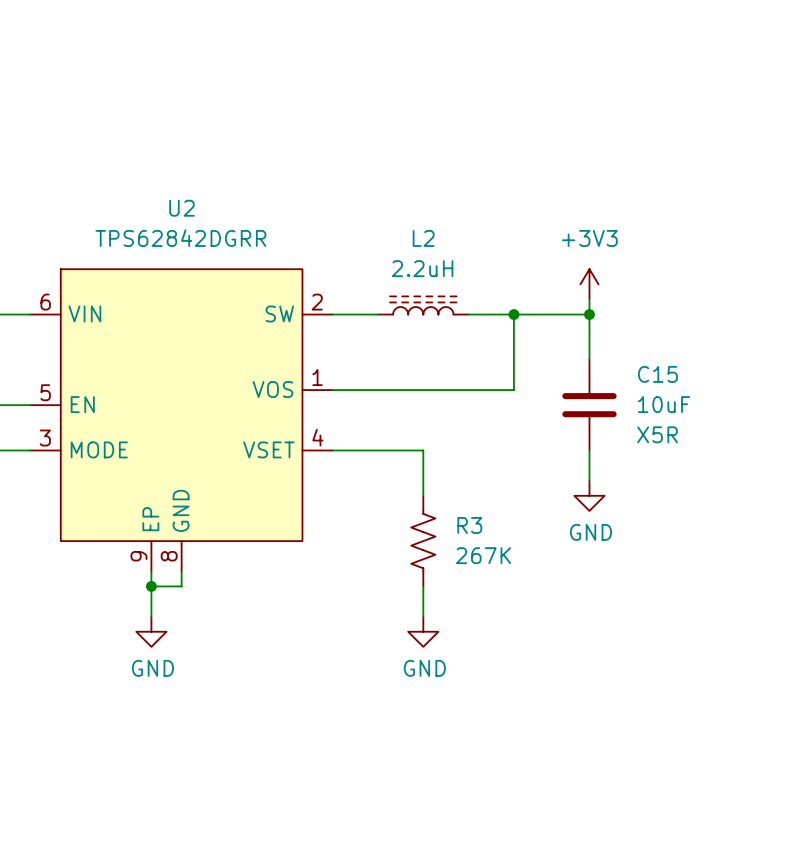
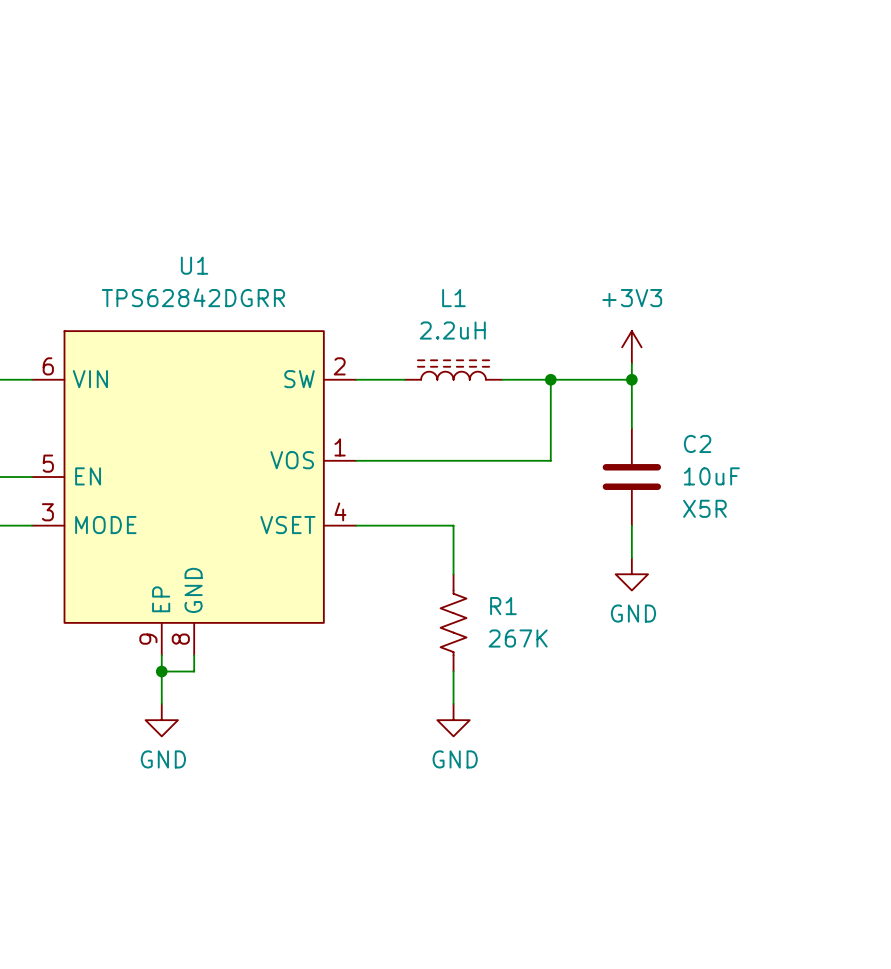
U2 name: U2 (181, 208) -> U1 (194, 265)
L2 name: L2 (423, 238) -> L1 (453, 298)
C15 name: C15 (657, 374) -> C2 (697, 443)
R3 name: R3 (469, 525) -> R1 (503, 606)

